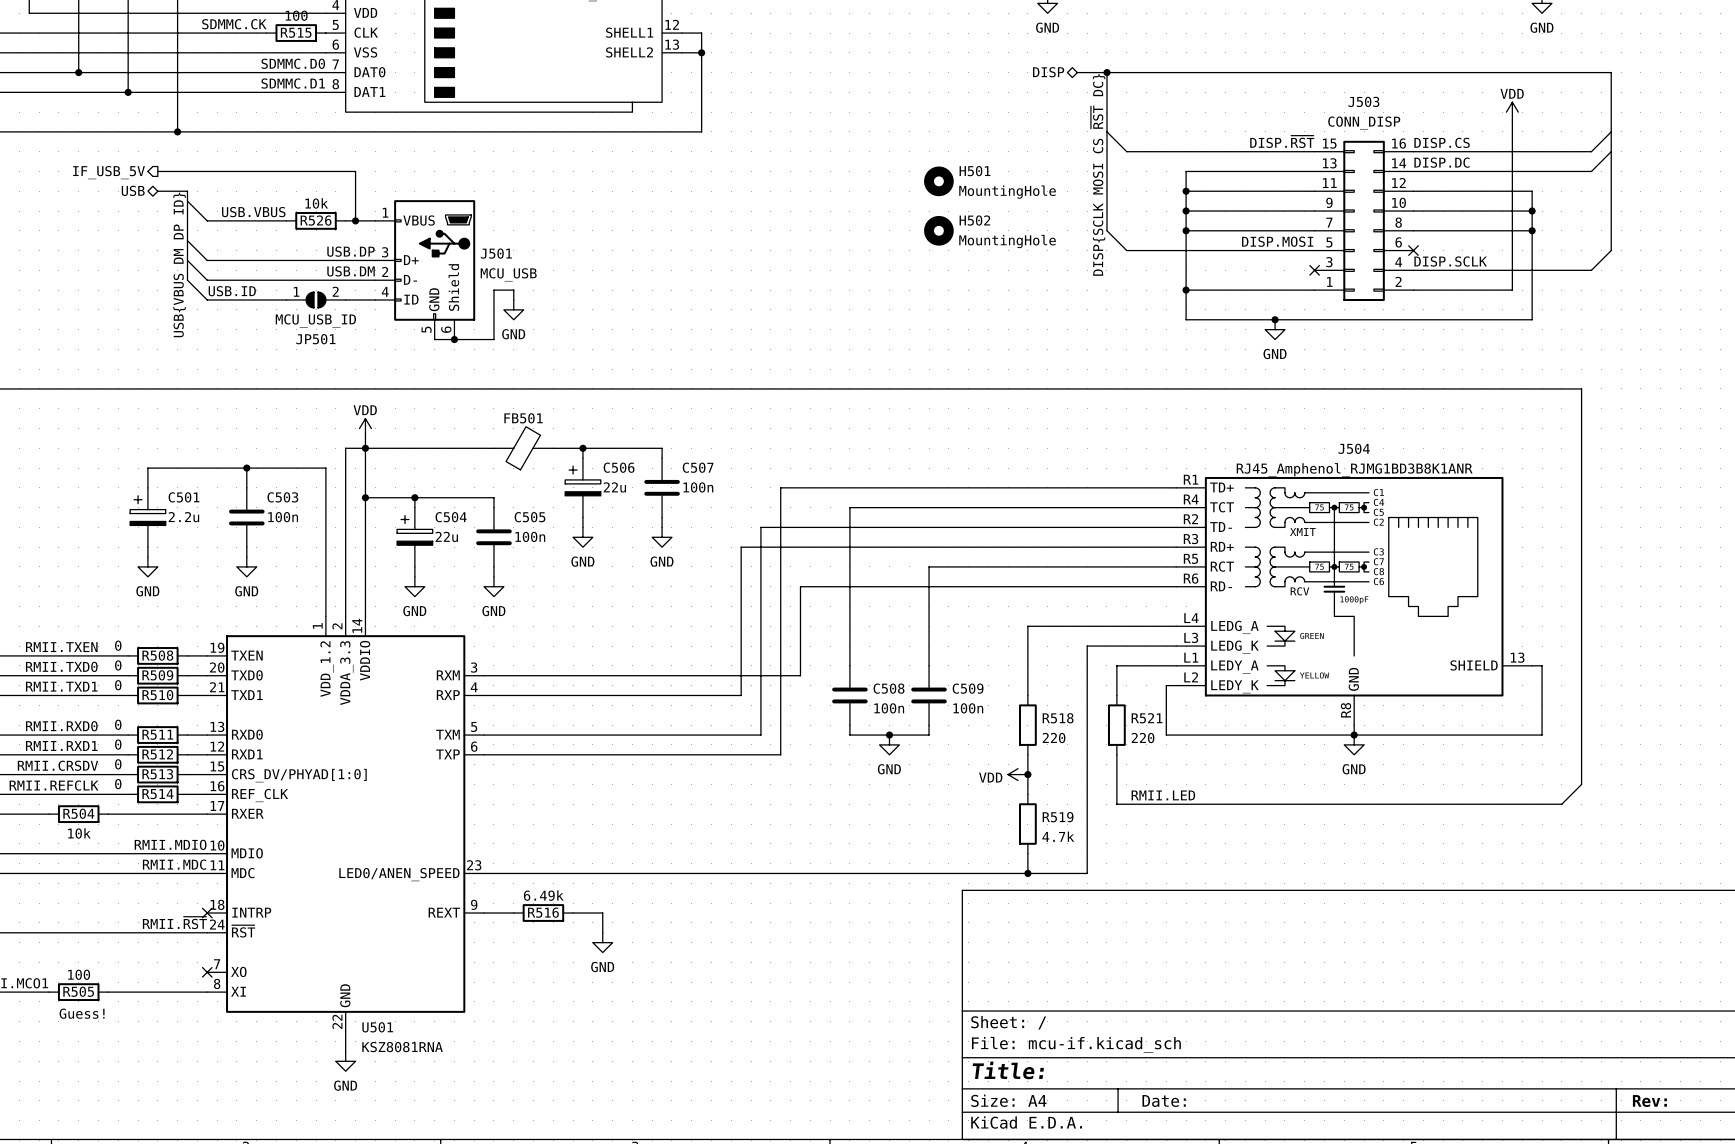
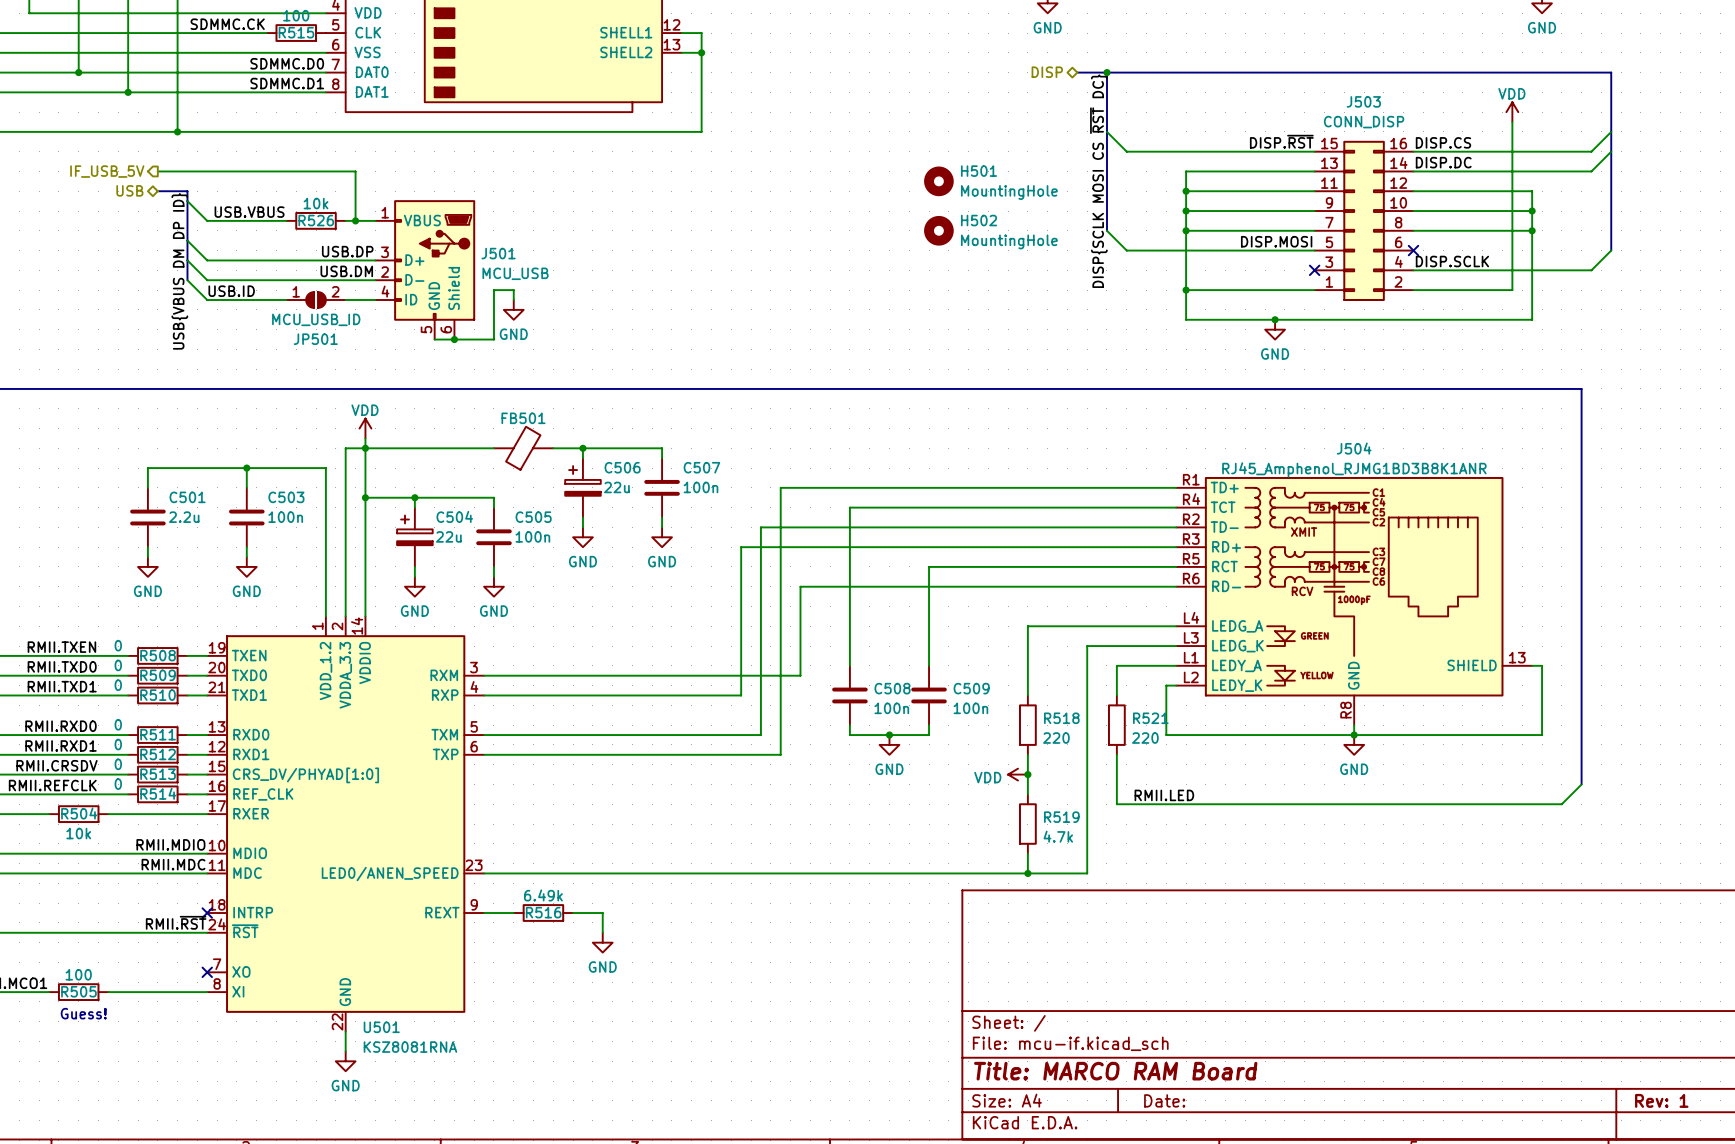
C501 symbol: [130, 487, 166, 548] -> [130, 487, 166, 548]
title block: Title: (1008, 1070) -> Title: MARCO RAM Board (1115, 1071)
title block: Rev: (1649, 1101) -> Rev: 1 (1661, 1100)

